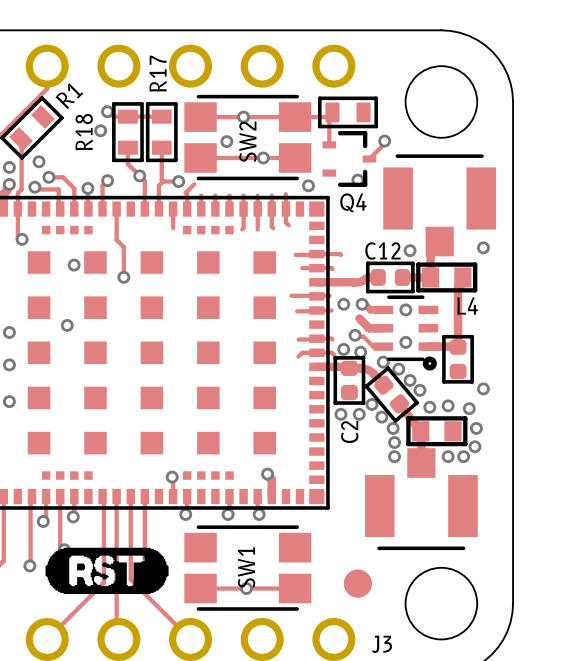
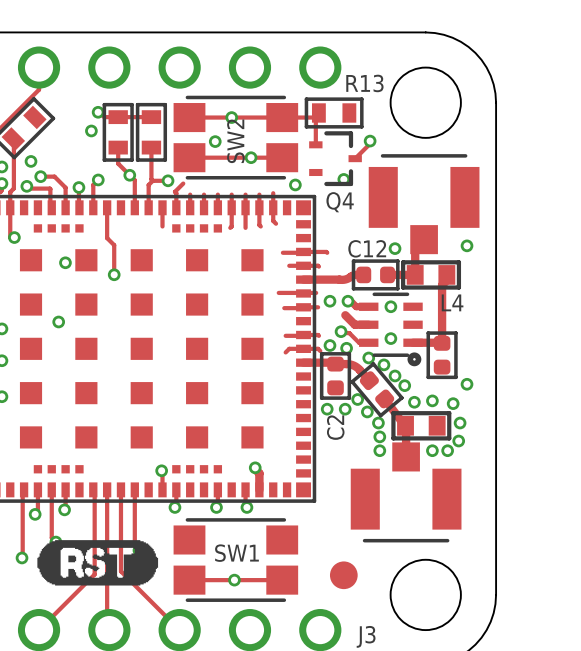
R17 name: R17 (158, 73) -> none
R13 name: none -> R13 (364, 83)
R1 name: R1 (69, 96) -> none
R18 name: R18 (84, 132) -> none
SW1 name rotation: 0° (246, 567) -> 90° clockwise (236, 553)

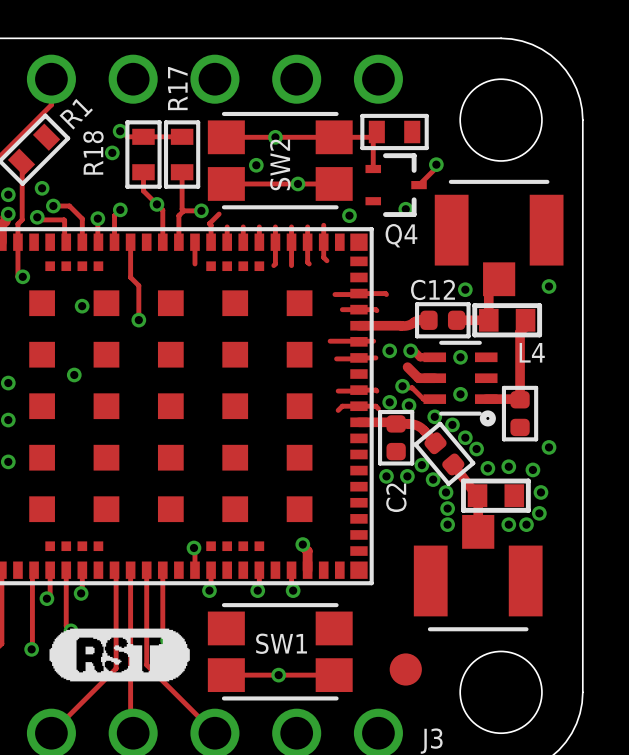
R17 name: none -> R17 (177, 88)
R13 name: R13 (364, 83) -> none
R1 name: none -> R1 (76, 114)
R18 name: none -> R18 (93, 152)

